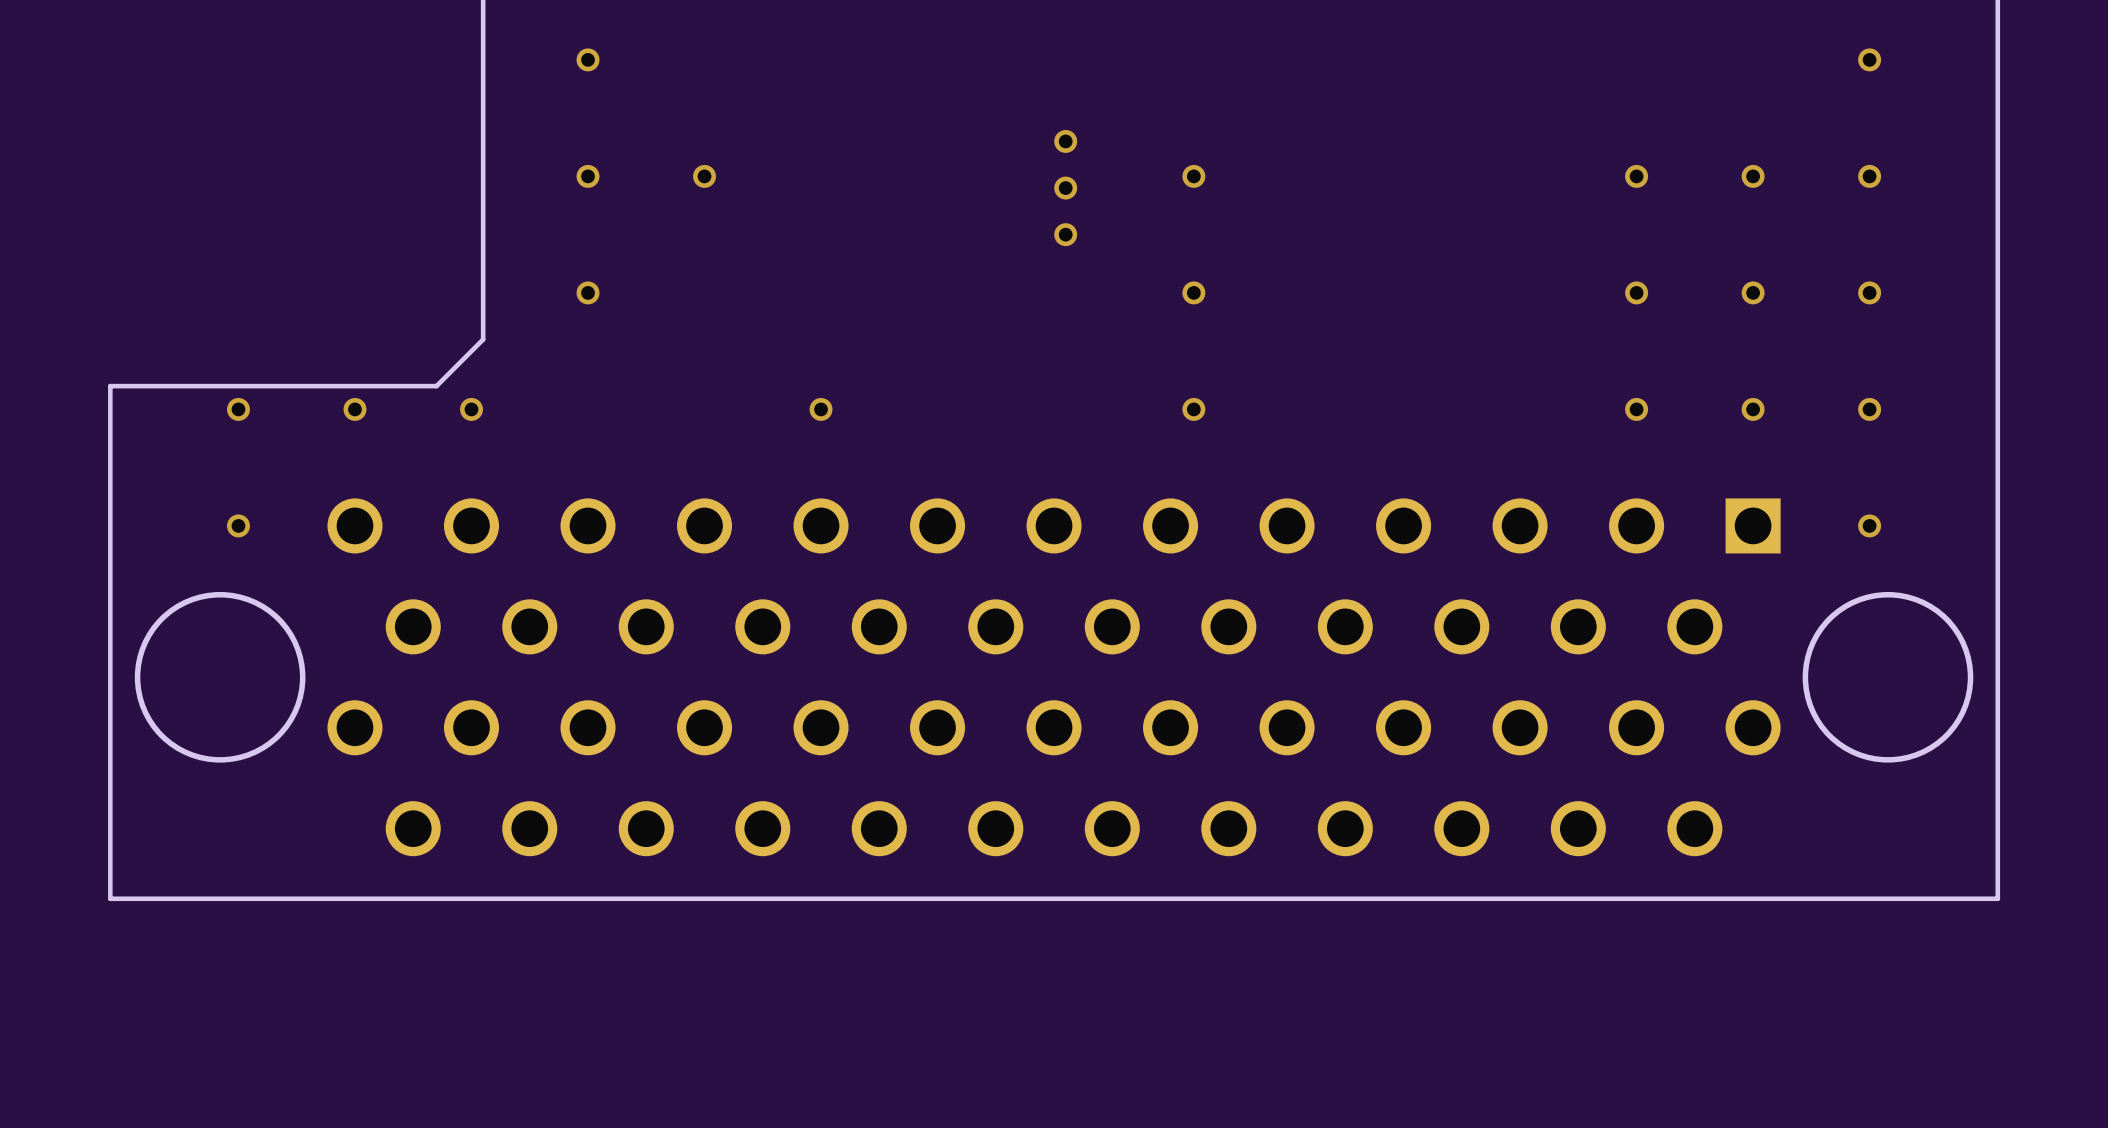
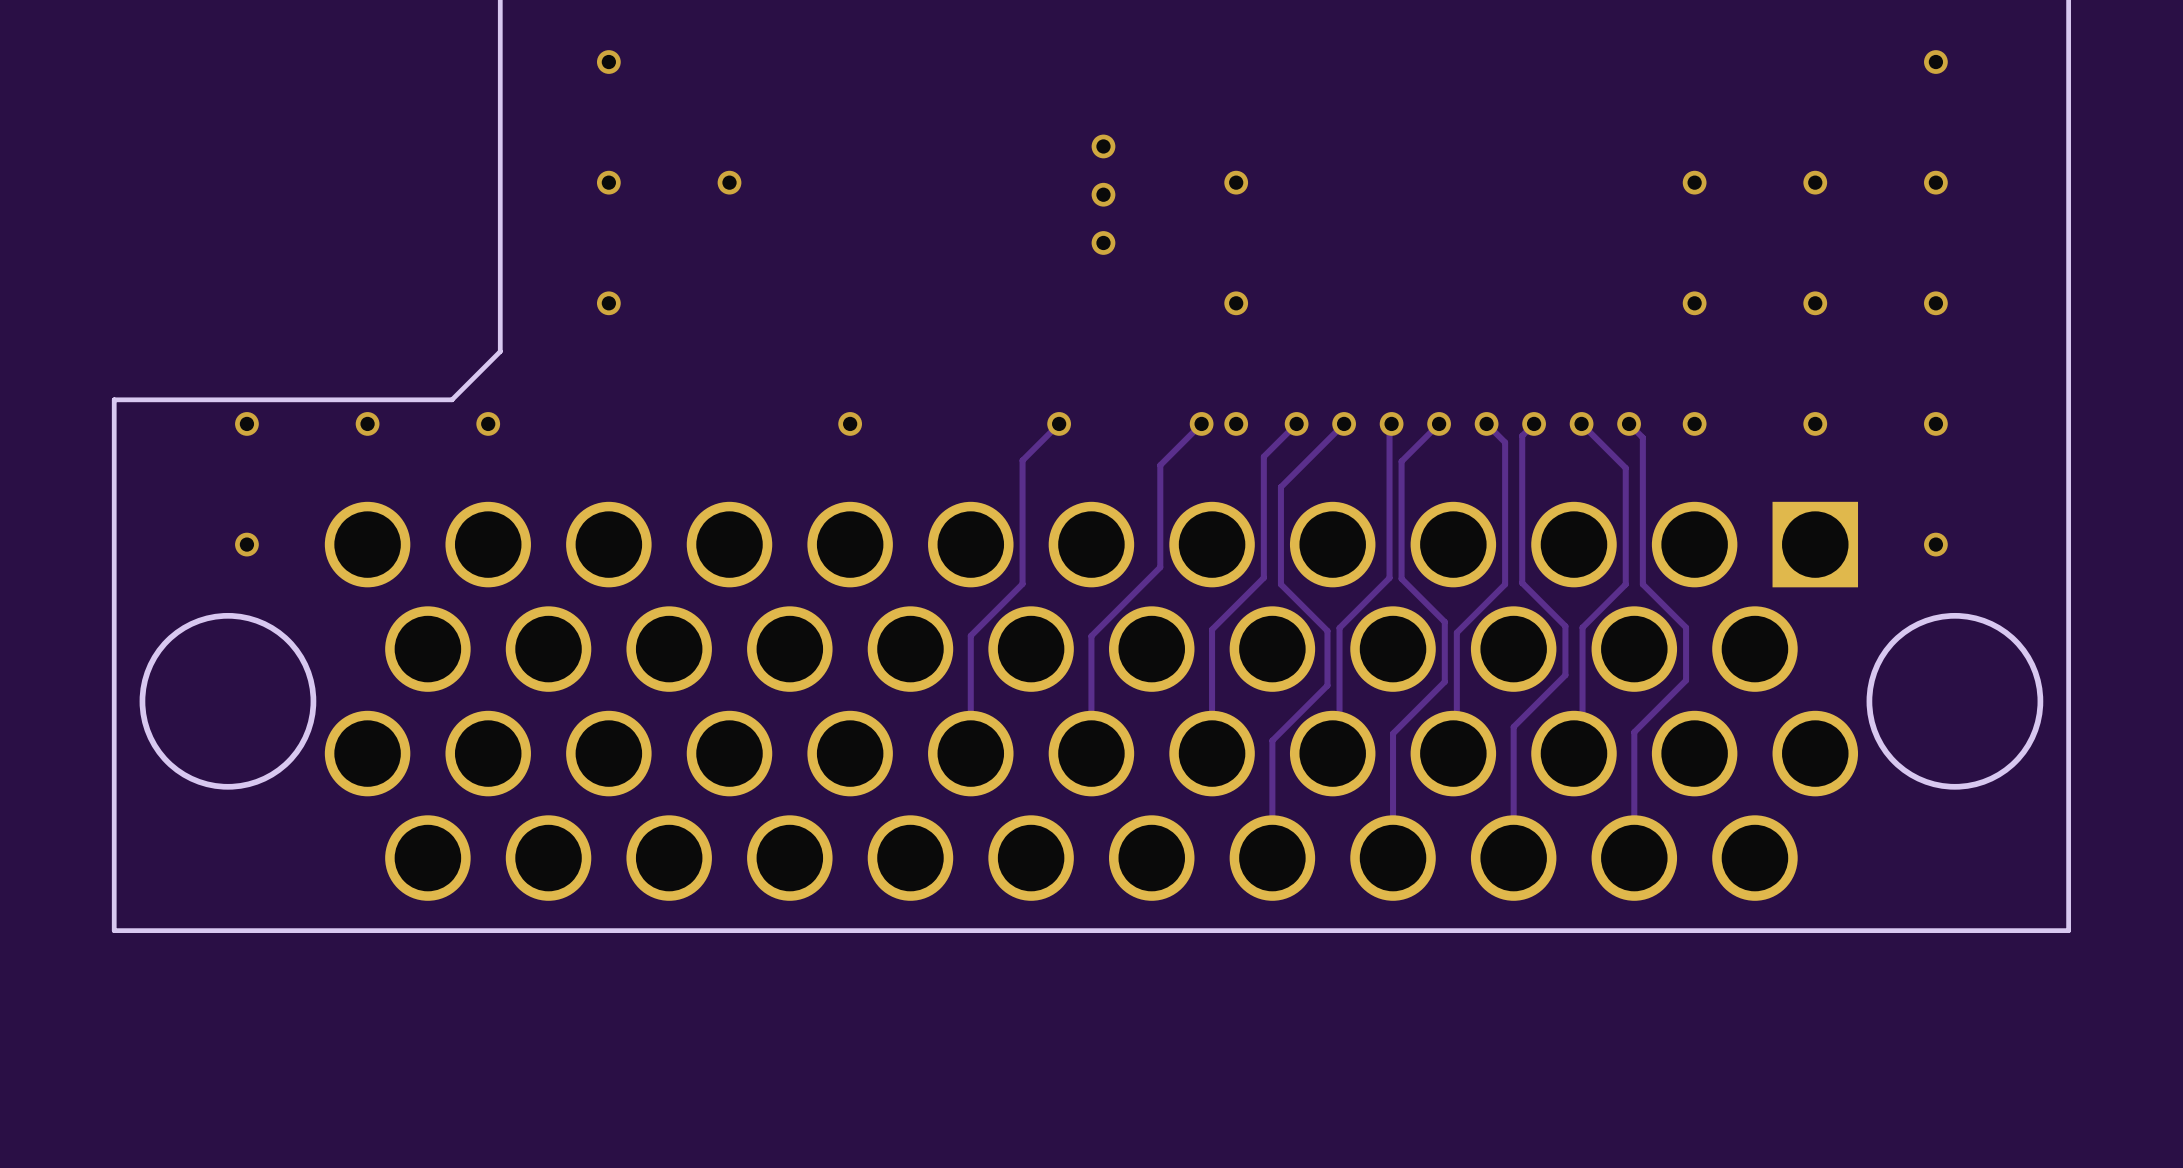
track: none -> (1059, 423) (1022, 460) (1022, 584) (970, 635) (970, 753)
via: none -> (1059, 423)
track: none -> (1201, 423) (1160, 465) (1160, 567) (1091, 636) (1091, 753)
via: none -> (1201, 423)
track: none -> (1296, 423) (1263, 456) (1263, 577) (1212, 629) (1212, 753)
via: none -> (1296, 423)
track: none -> (1344, 423) (1280, 487) (1280, 584) (1327, 630) (1327, 685) (1272, 740) (1272, 858)
via: none -> (1344, 423)
track: none -> (1391, 423) (1389, 426) (1389, 577) (1339, 628) (1339, 746) (1332, 753)
via: none -> (1391, 423)
track: none -> (1439, 423) (1401, 461) (1401, 578) (1444, 622) (1444, 681) (1393, 733) (1393, 858)
via: none -> (1439, 423)
track: none -> (1486, 423) (1505, 442) (1505, 584) (1456, 632) (1456, 750) (1453, 753)
via: none -> (1486, 423)
track: none -> (1534, 423) (1522, 435) (1522, 583) (1565, 626) (1565, 675) (1513, 726) (1513, 858)
via: none -> (1534, 423)
track: none -> (1581, 423) (1625, 468) (1625, 584) (1582, 627) (1582, 745) (1573, 753)
via: none -> (1581, 423)
track: none -> (1629, 423) (1642, 437) (1642, 584) (1686, 627) (1686, 680) (1634, 732) (1634, 858)
via: none -> (1629, 423)
part footprint: [134, 498, 1974, 857] -> [139, 501, 2044, 901]

